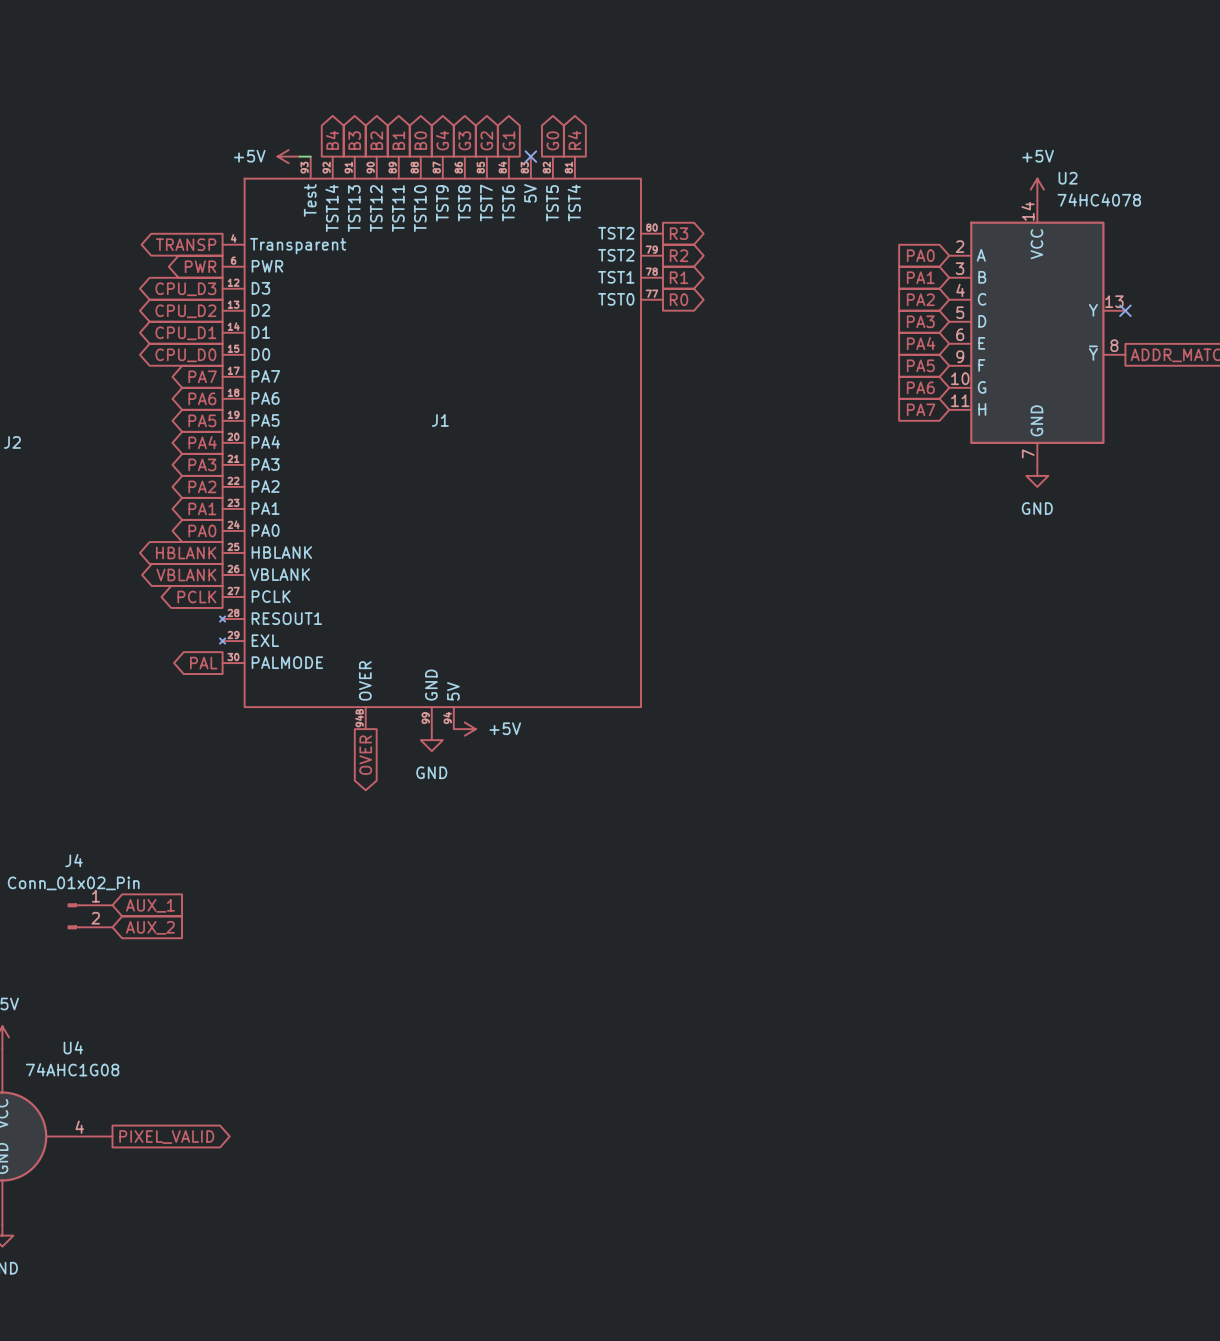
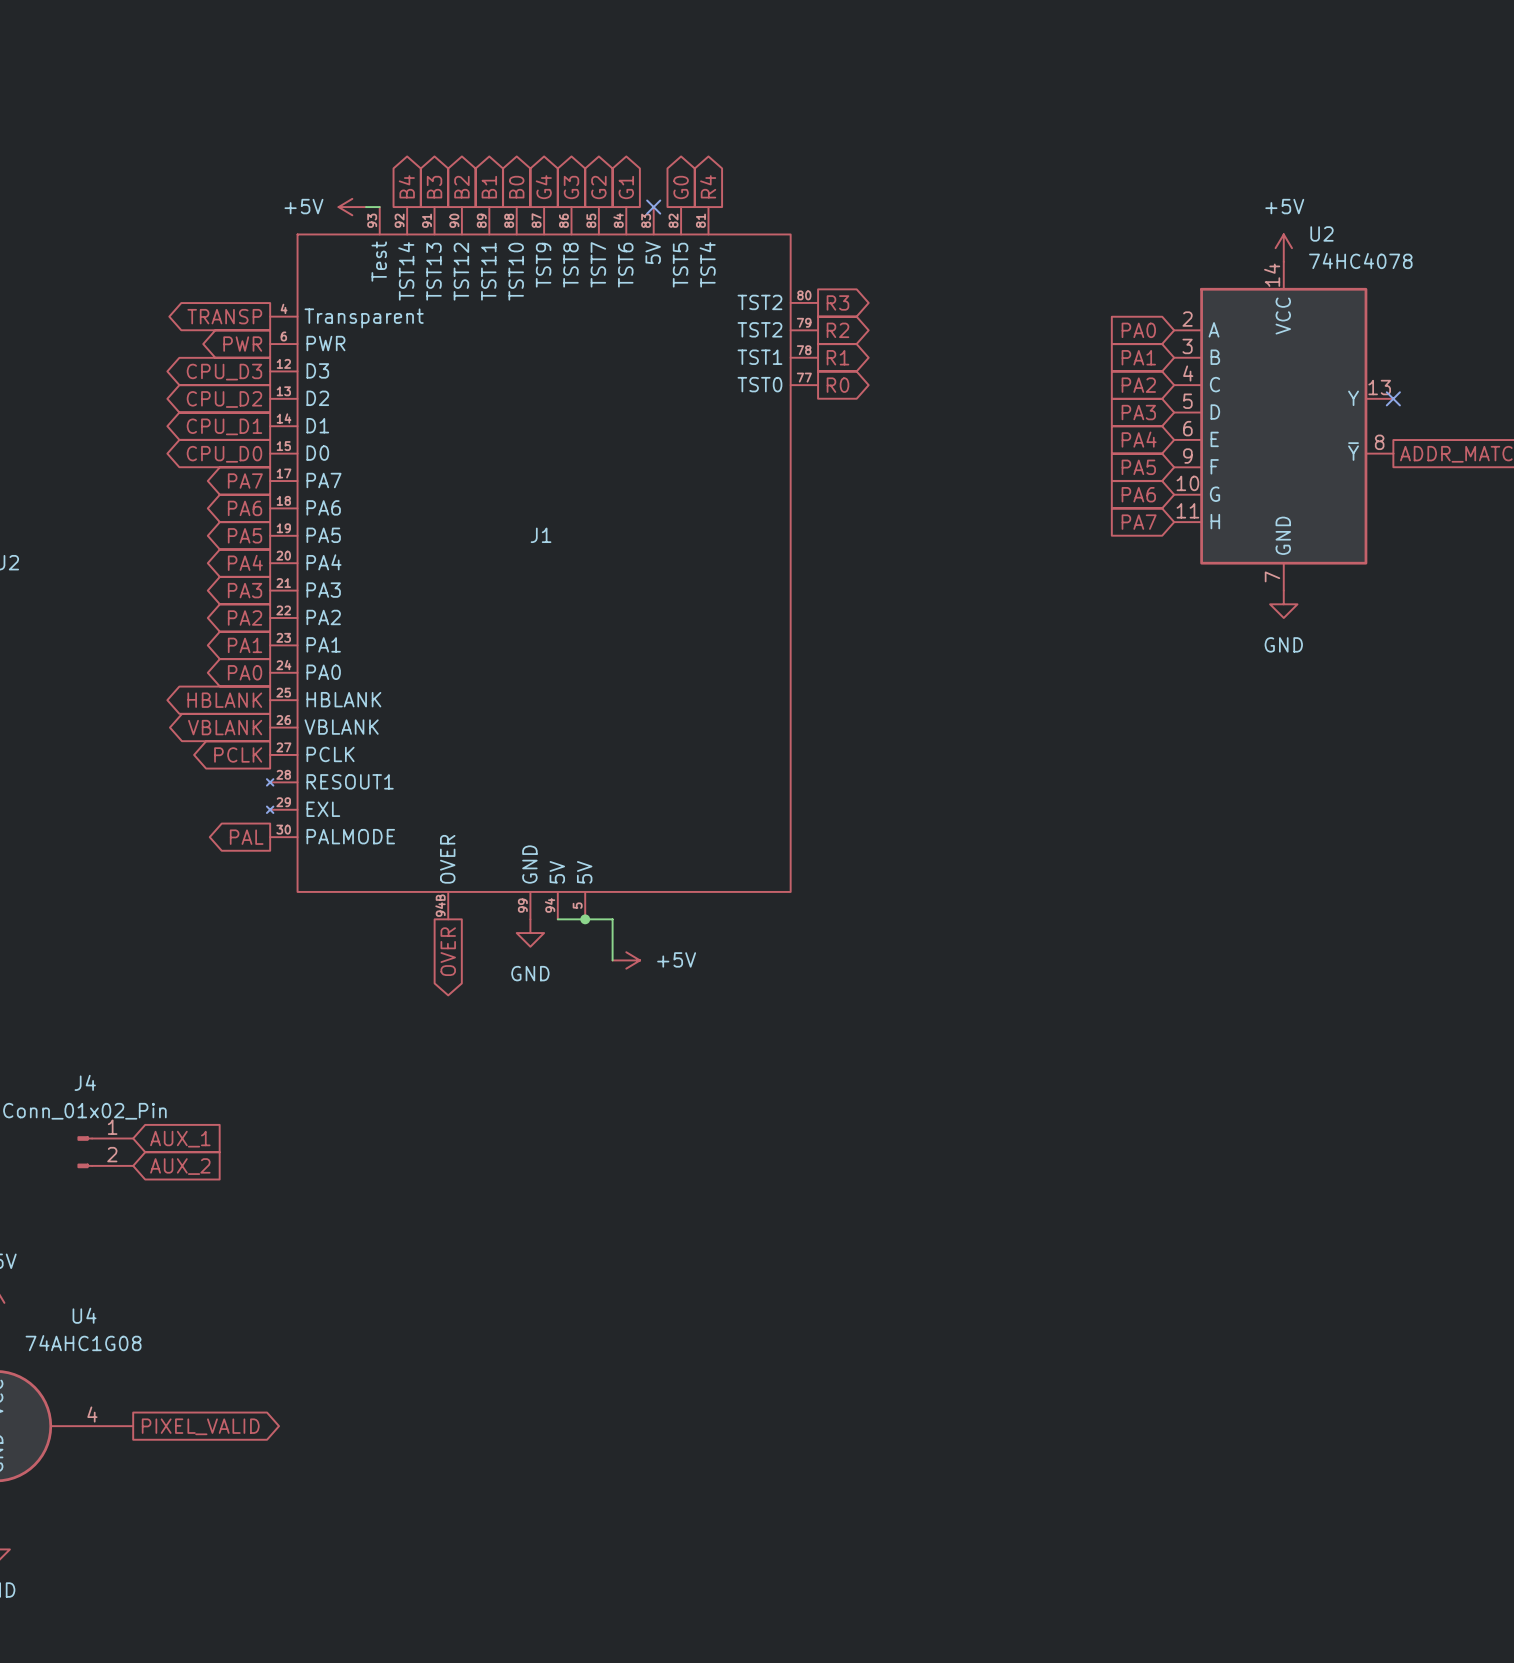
J1 symbol: [220, 156, 664, 730] -> [266, 207, 819, 920]
wire: none -> (557, 919) (612, 919) (612, 960)
power symbol position: +5V (464, 729) -> +5V (626, 960)
junction: none -> (585, 919)

